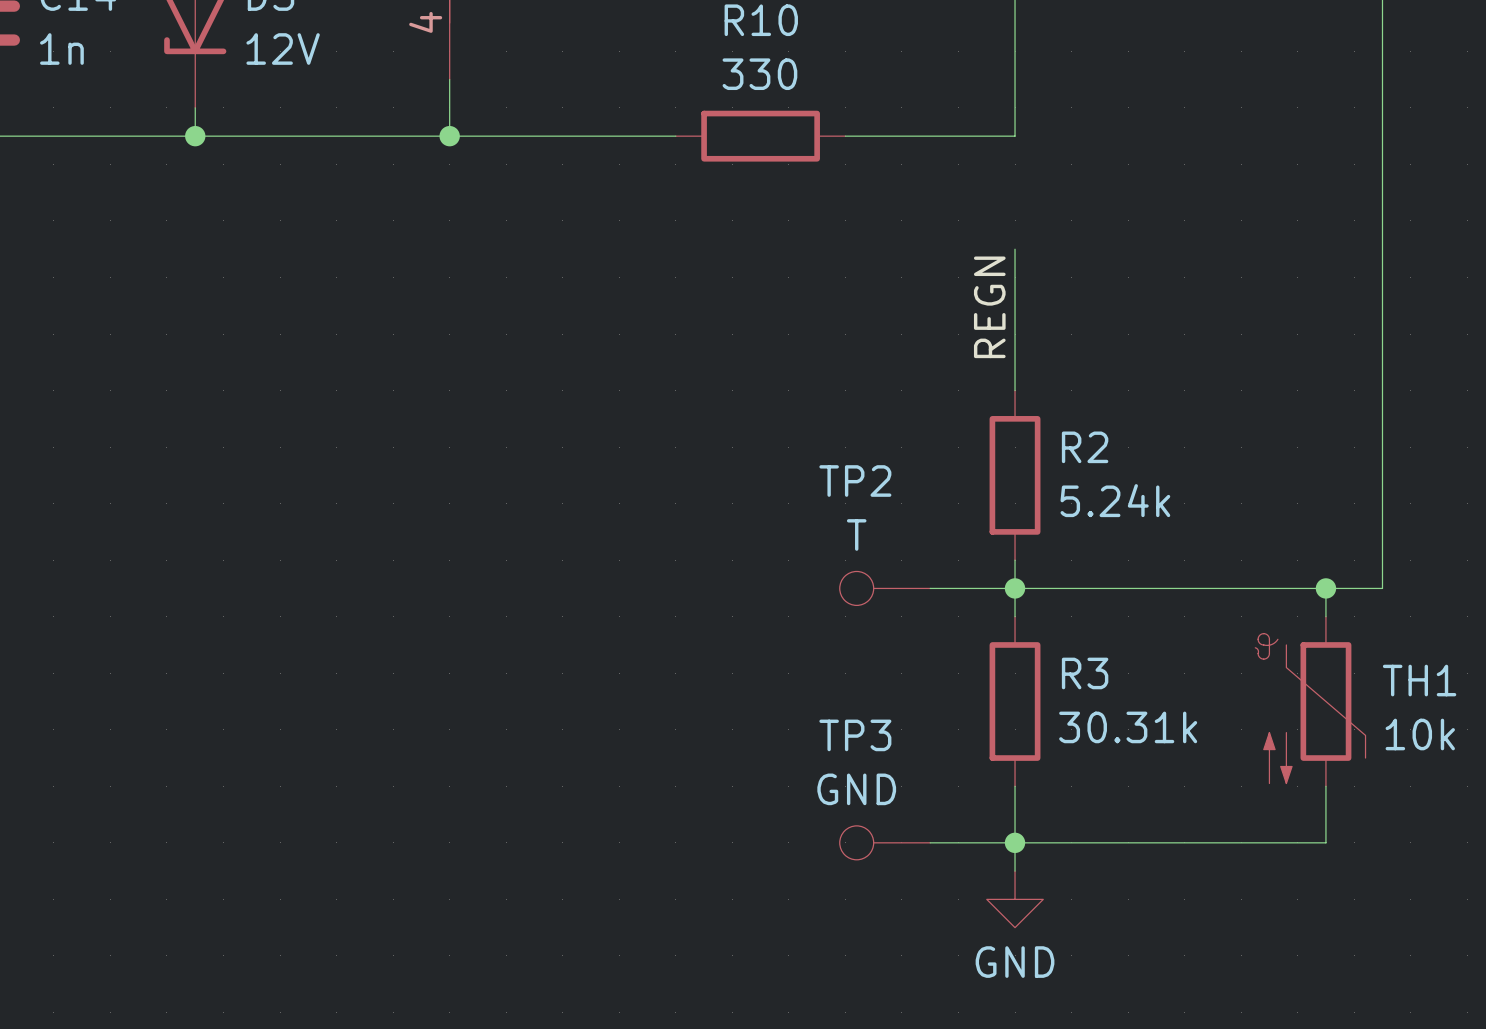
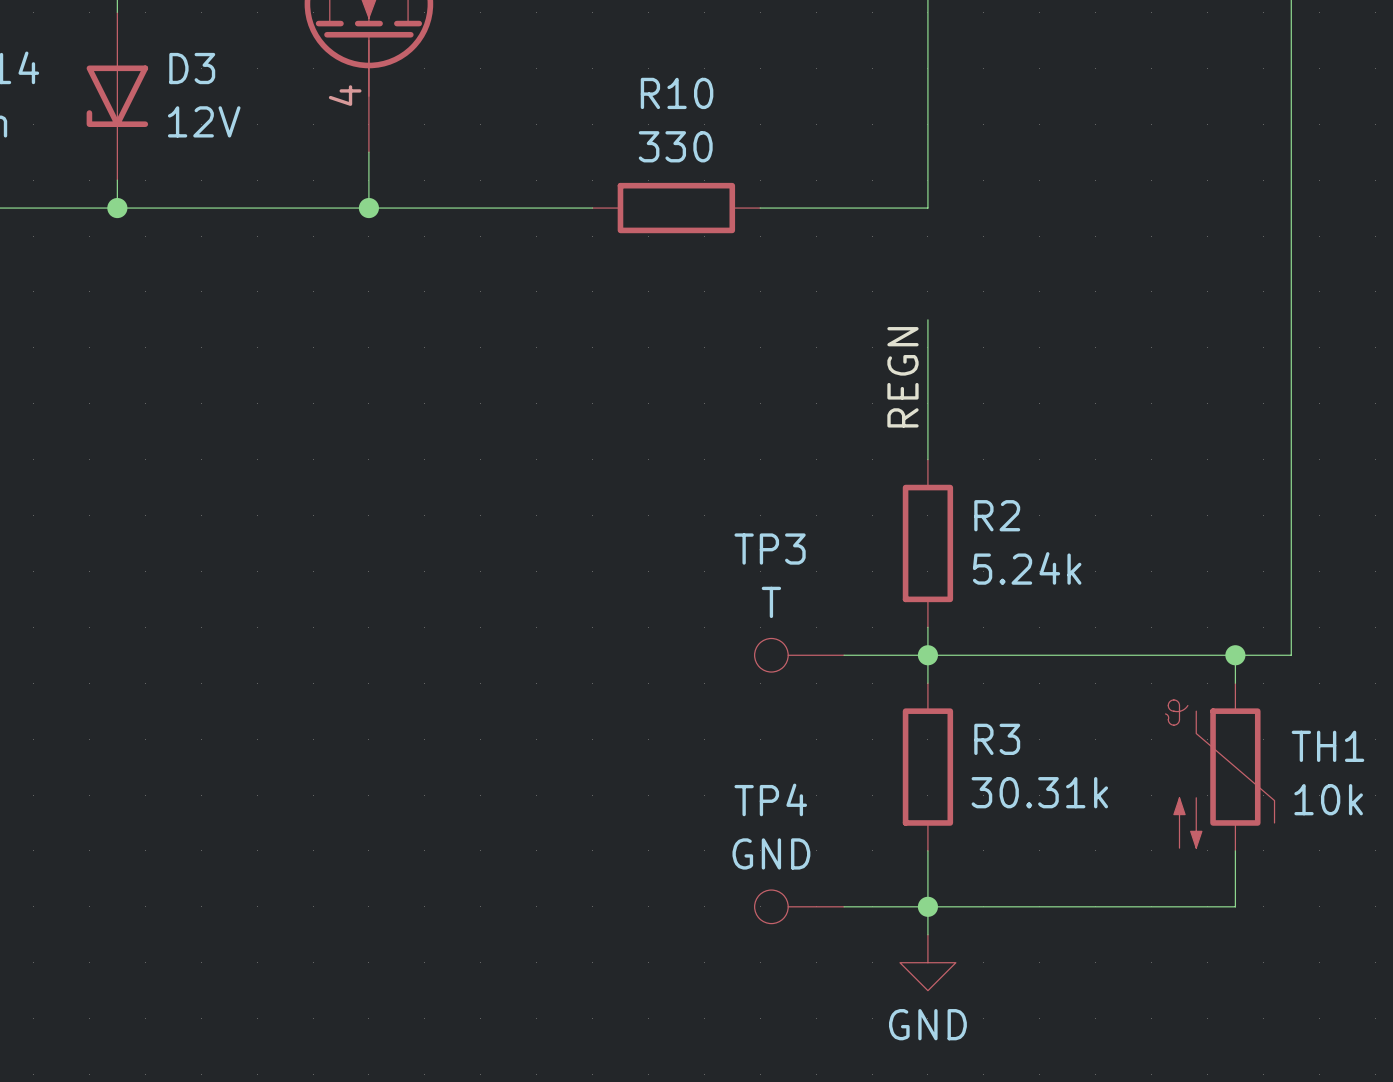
TP2 name: TP2 (855, 481) -> TP3 (770, 549)
TP3 name: TP3 (855, 735) -> TP4 (770, 799)

